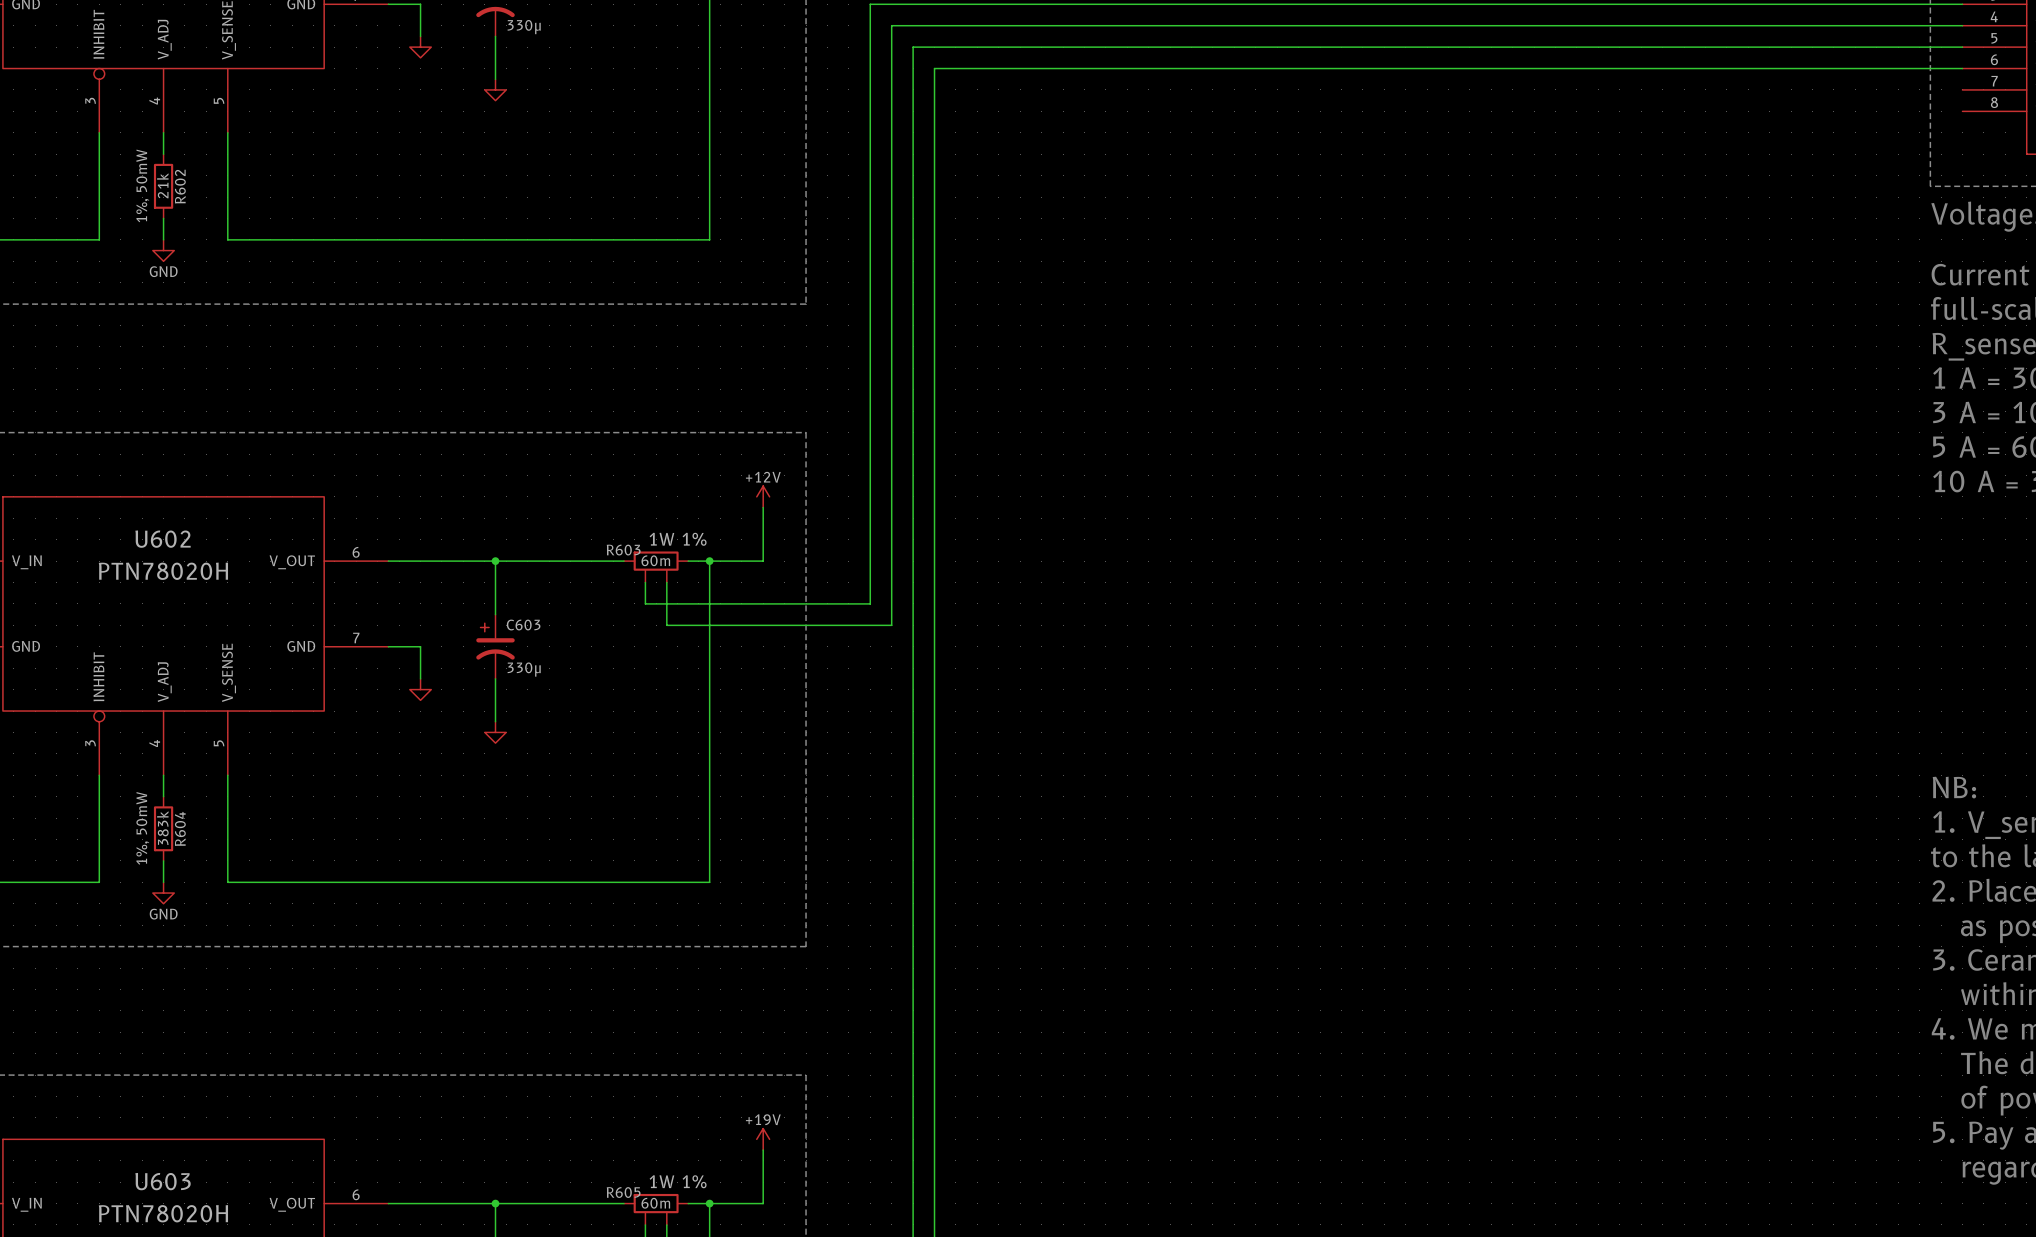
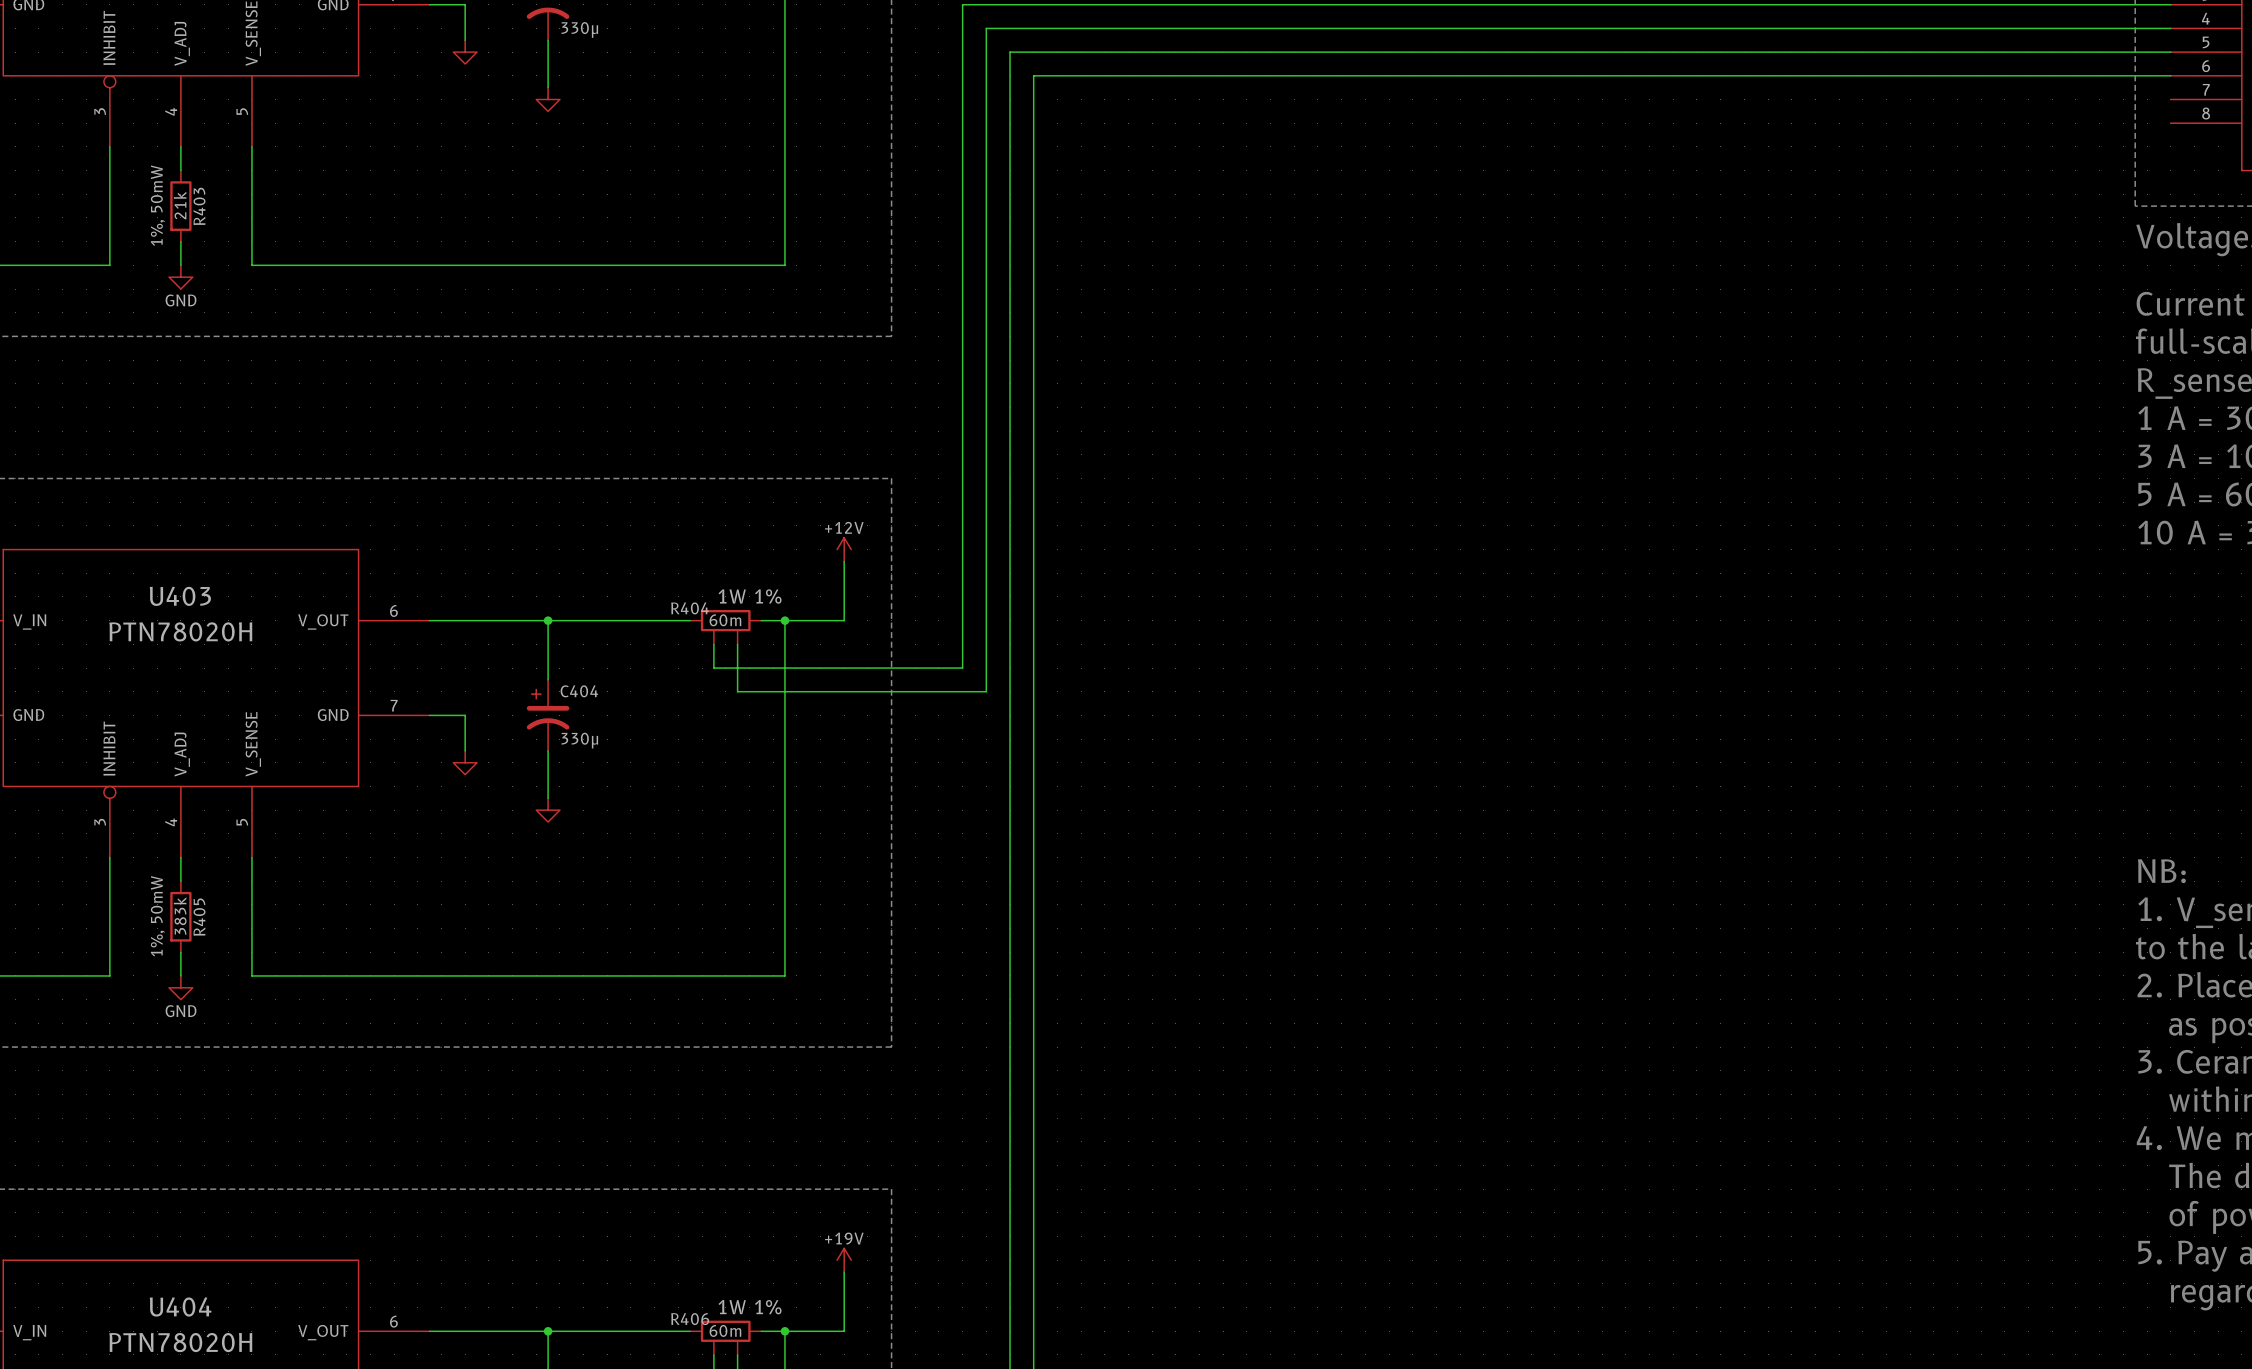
R602 name: R602 (180, 186) -> R403 (199, 206)
U602 name: U602 (163, 539) -> U403 (180, 596)
R603 name: R603 (623, 550) -> R404 (690, 608)
C603 name: C603 (523, 625) -> C404 (579, 691)
R604 name: R604 (180, 828) -> R405 (199, 917)
U603 name: U603 (163, 1181) -> U404 (180, 1307)
R605 name: R605 (623, 1192) -> R406 (690, 1319)

